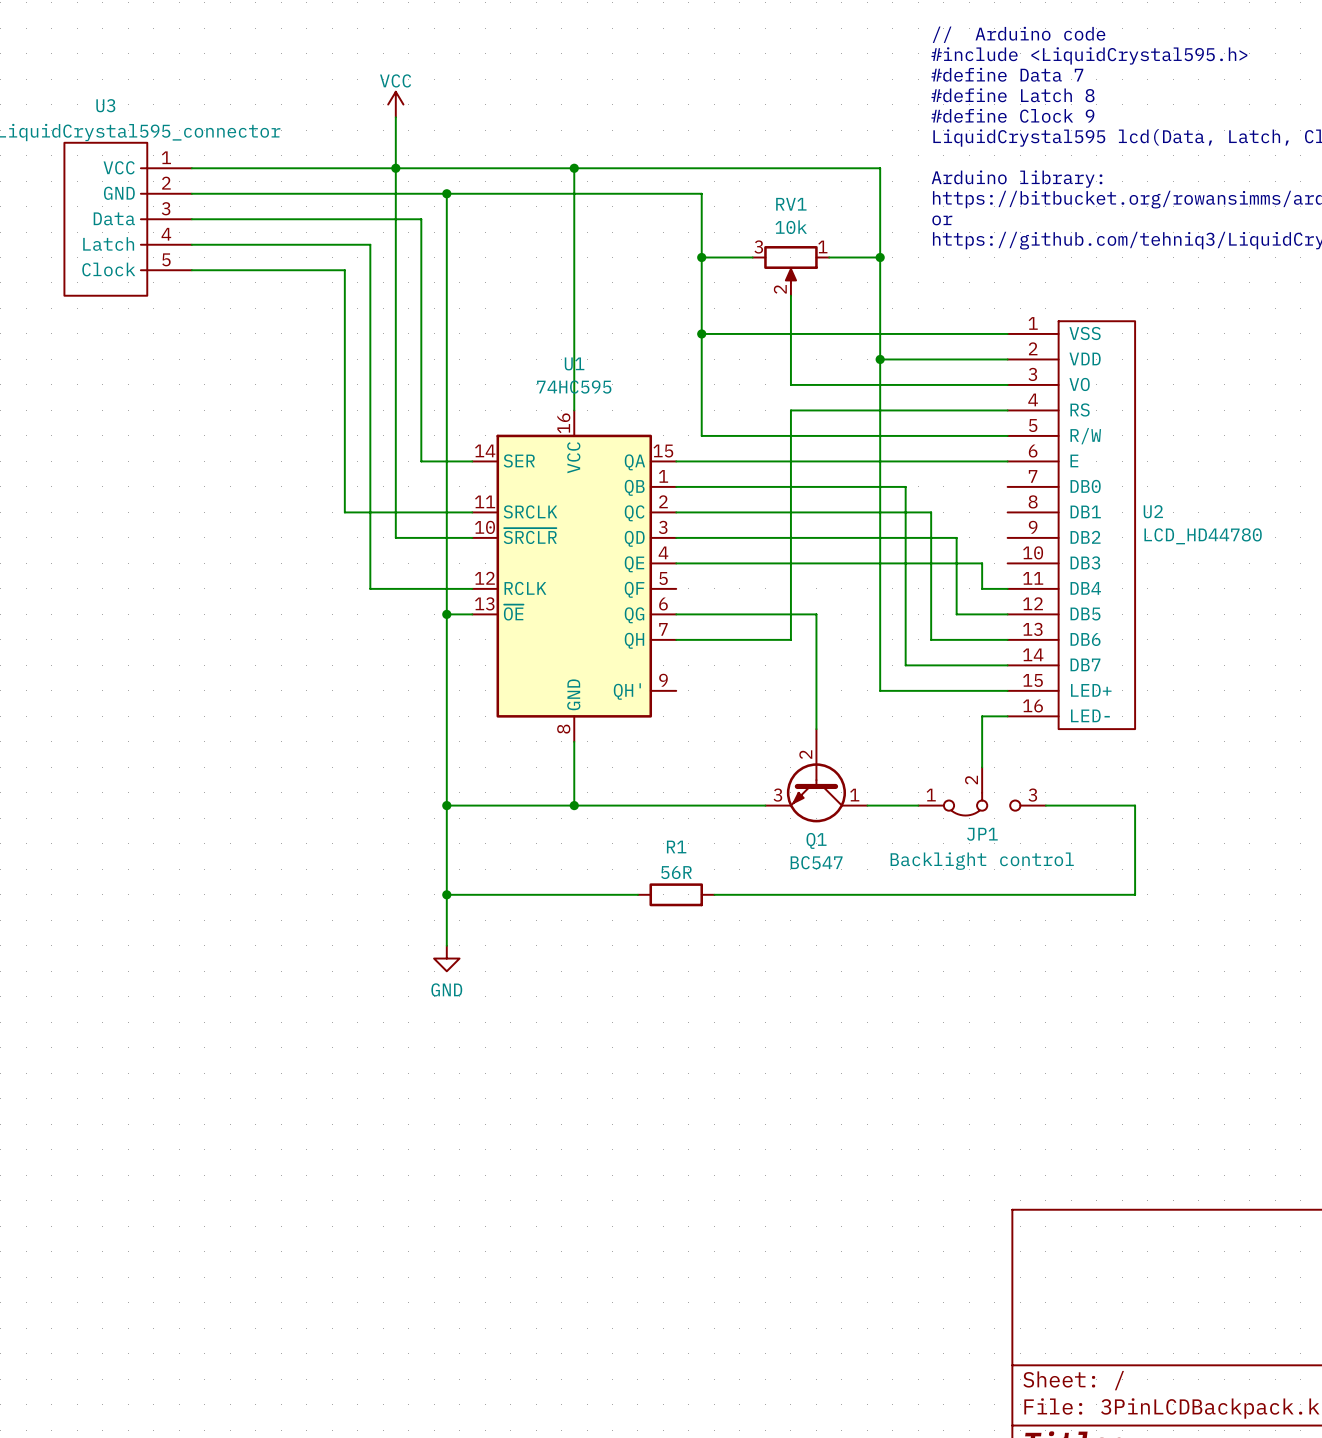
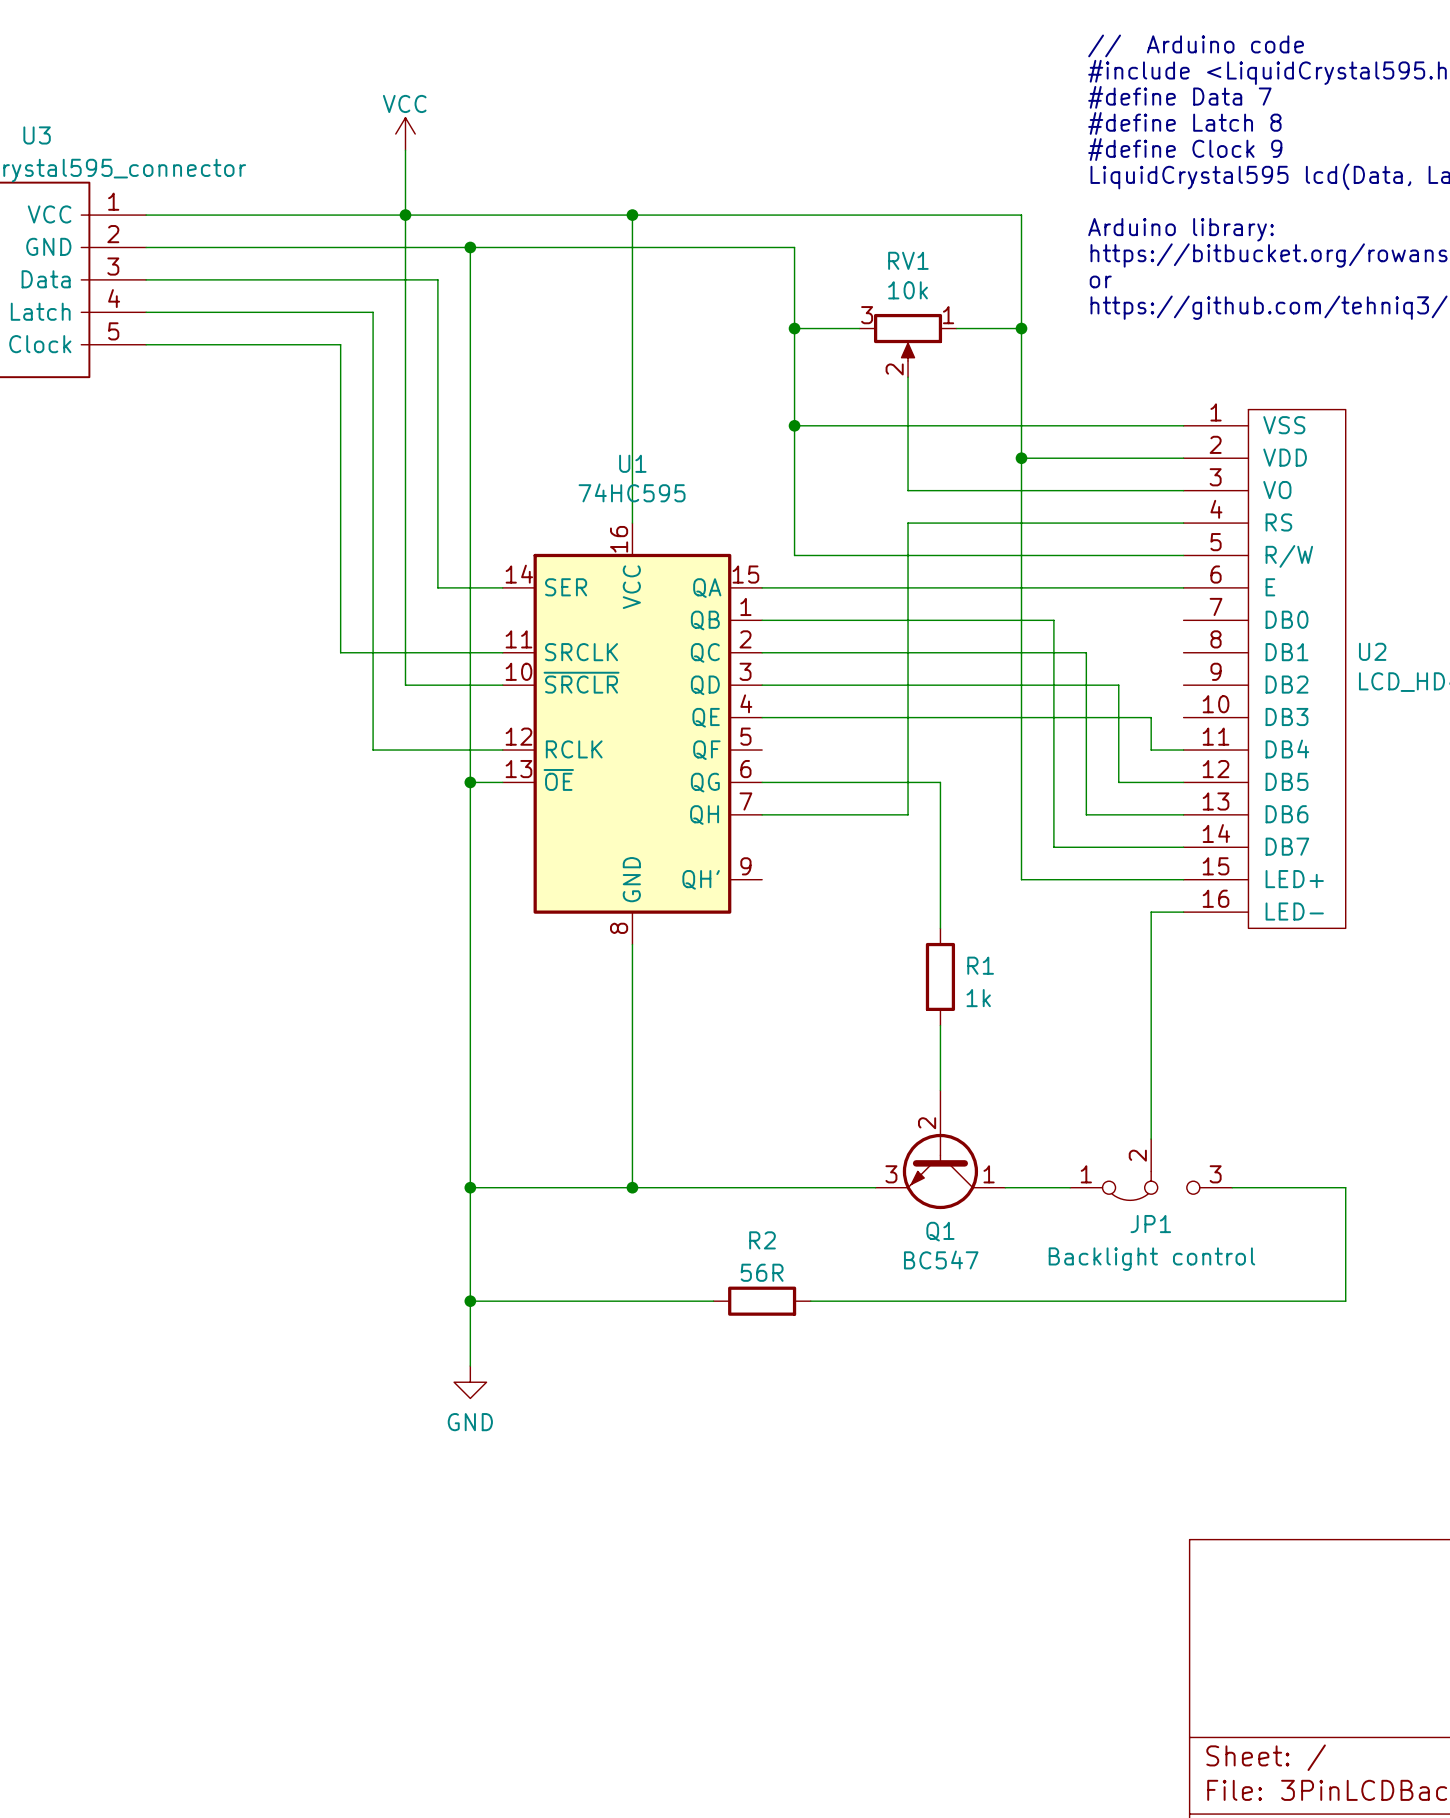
wire: none -> (1151, 976) (1151, 1139)
Q1 position: (816, 775) -> (940, 1149)
JP1 position: (982, 791) -> (1151, 1169)
wire: (446, 805) (765, 805) -> (470, 1187) (875, 1187)
junction: (446, 805) -> none
wire: none -> (632, 1025) (632, 1187)
junction: (574, 805) -> none
wire: none -> (940, 1025) (940, 1090)
wire: (867, 805) (918, 805) -> (1005, 1187) (1070, 1187)
wire: (1045, 805) (1135, 805) (1135, 894) (714, 894) -> (1232, 1187) (1345, 1187) (1345, 1301) (810, 1301)
R1 value: 56R (676, 872) -> 1k (978, 998)
wire: (446, 894) (637, 894) -> (470, 1301) (713, 1301)
junction position: (446, 894) -> (470, 1187)
R1 rotation: 0° (676, 894) -> 90° clockwise (940, 976)
R1 position: (676, 894) -> (940, 976)
junction: none -> (632, 1187)
wire: none -> (470, 1203) (470, 1366)
power symbol position: GND (446, 958) -> GND (470, 1382)
junction: none -> (470, 1301)
R2: none -> 56R (762, 1301)

